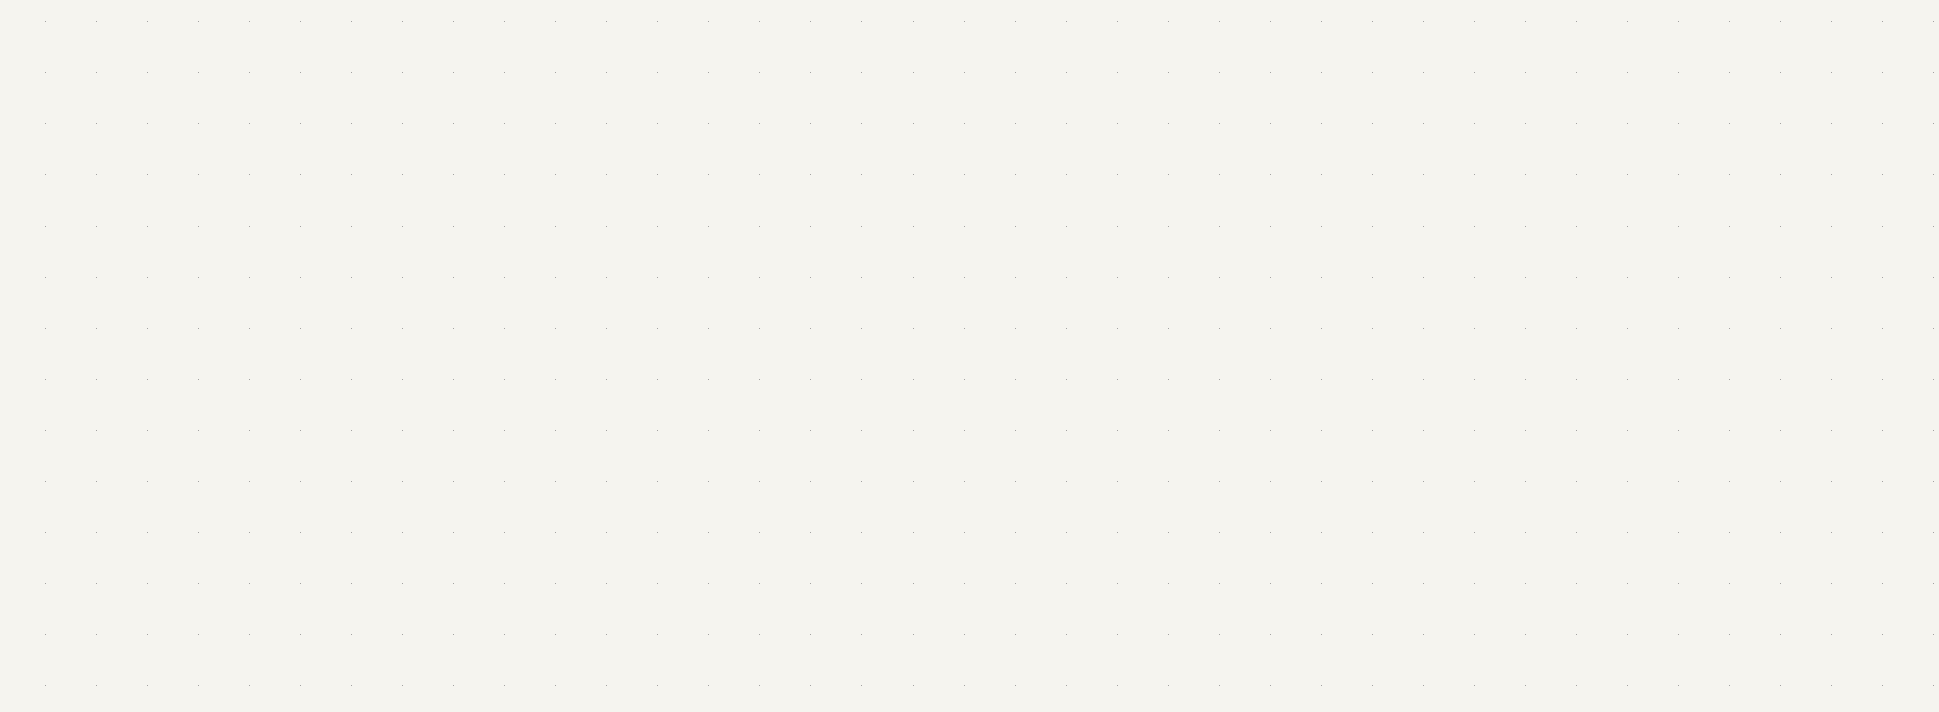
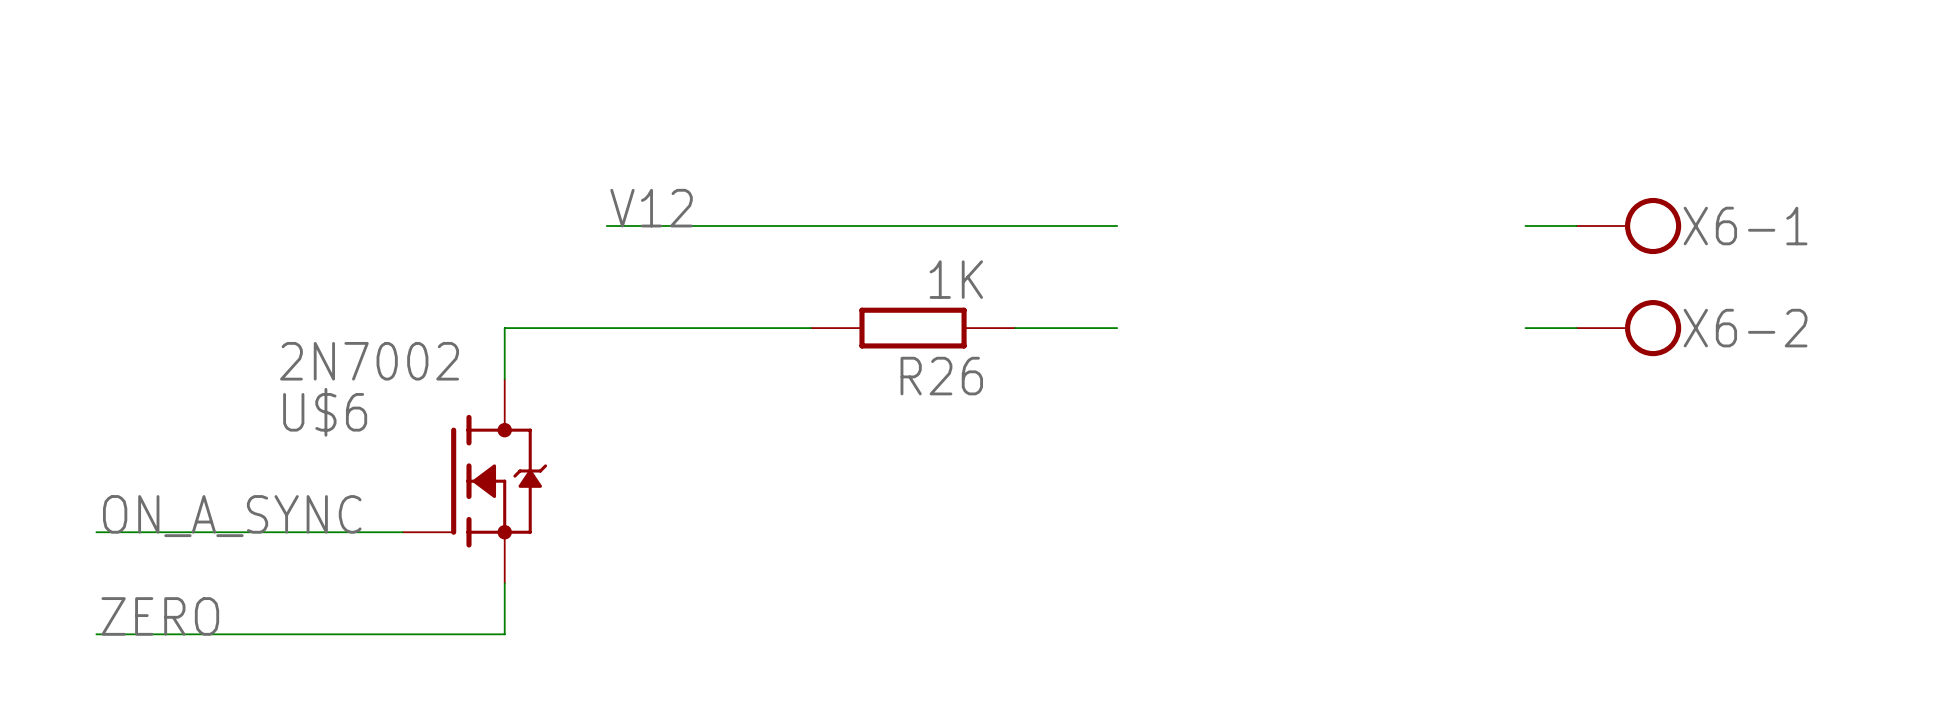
label: none -> V12 (651, 208)
wire: none -> (606, 226) (1117, 226)
wire: none -> (1525, 226) (1576, 226)
X6-1: none -> (1628, 226)
wire: none -> (810, 328) (504, 328) (504, 379)
R26: none -> 1K (913, 328)
wire: none -> (1015, 328) (1117, 328)
wire: none -> (1525, 328) (1576, 328)
X6-2: none -> (1628, 328)
U$6: none -> 2N7002 (474, 481)
label: none -> ON_A_SYNC (232, 516)
wire: none -> (96, 532) (402, 532)
wire: none -> (504, 583) (504, 634) (96, 634)
label: none -> ZERO (160, 616)

